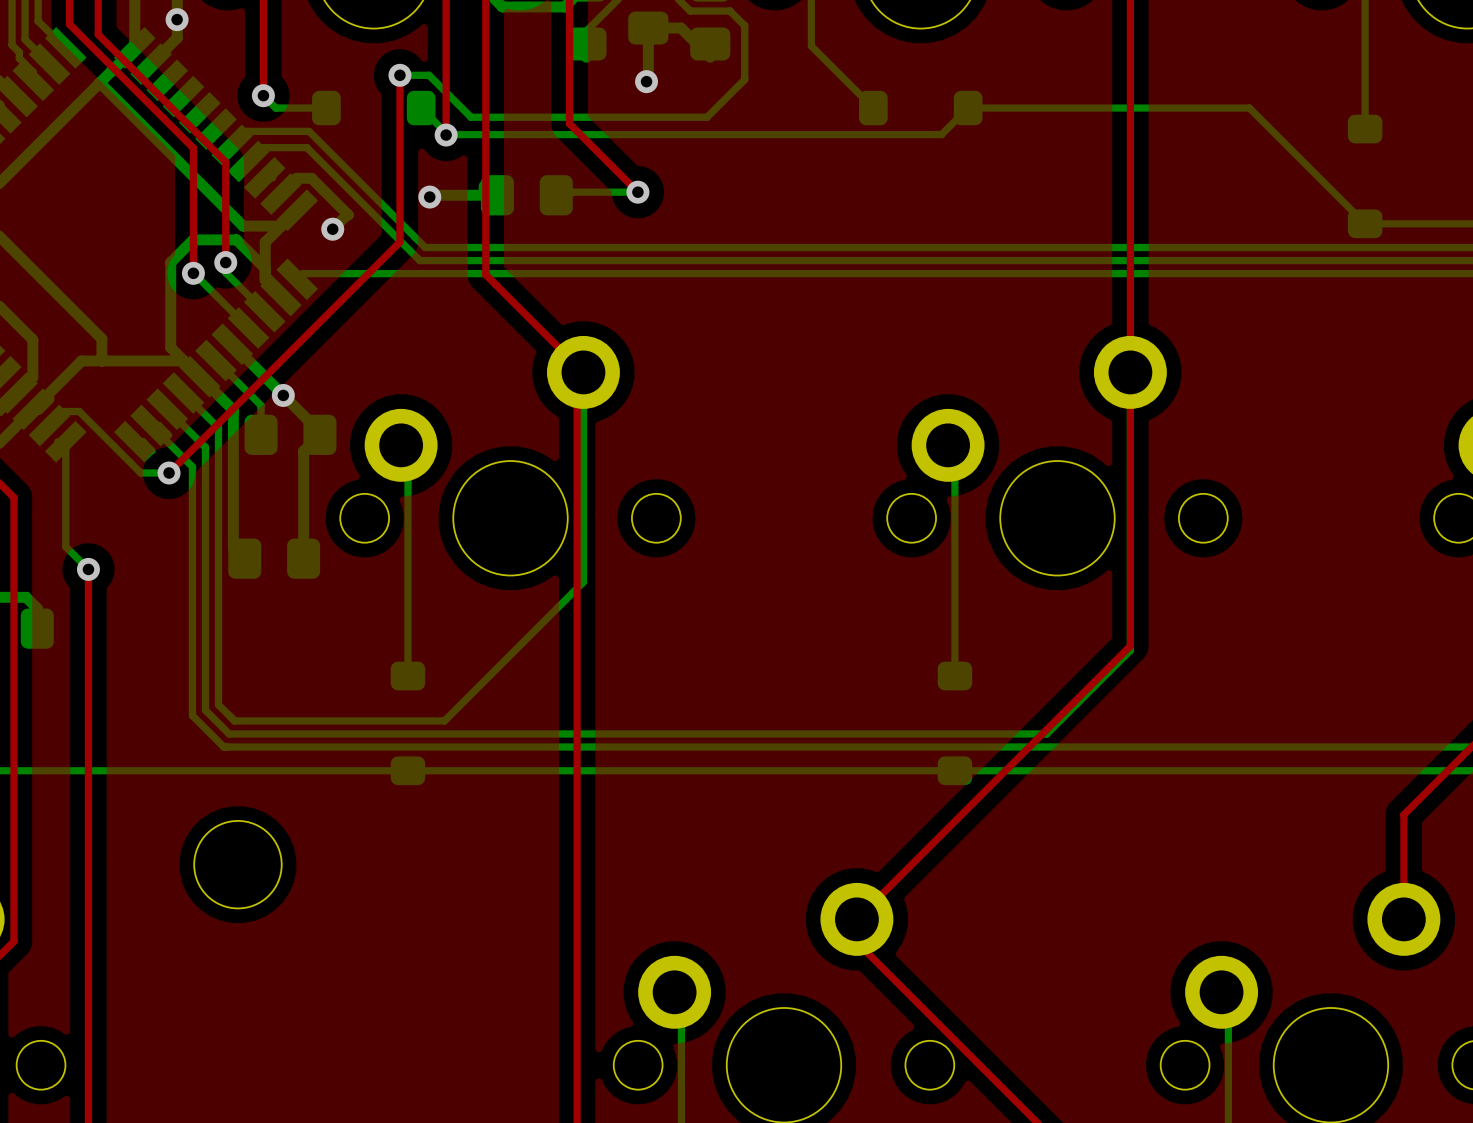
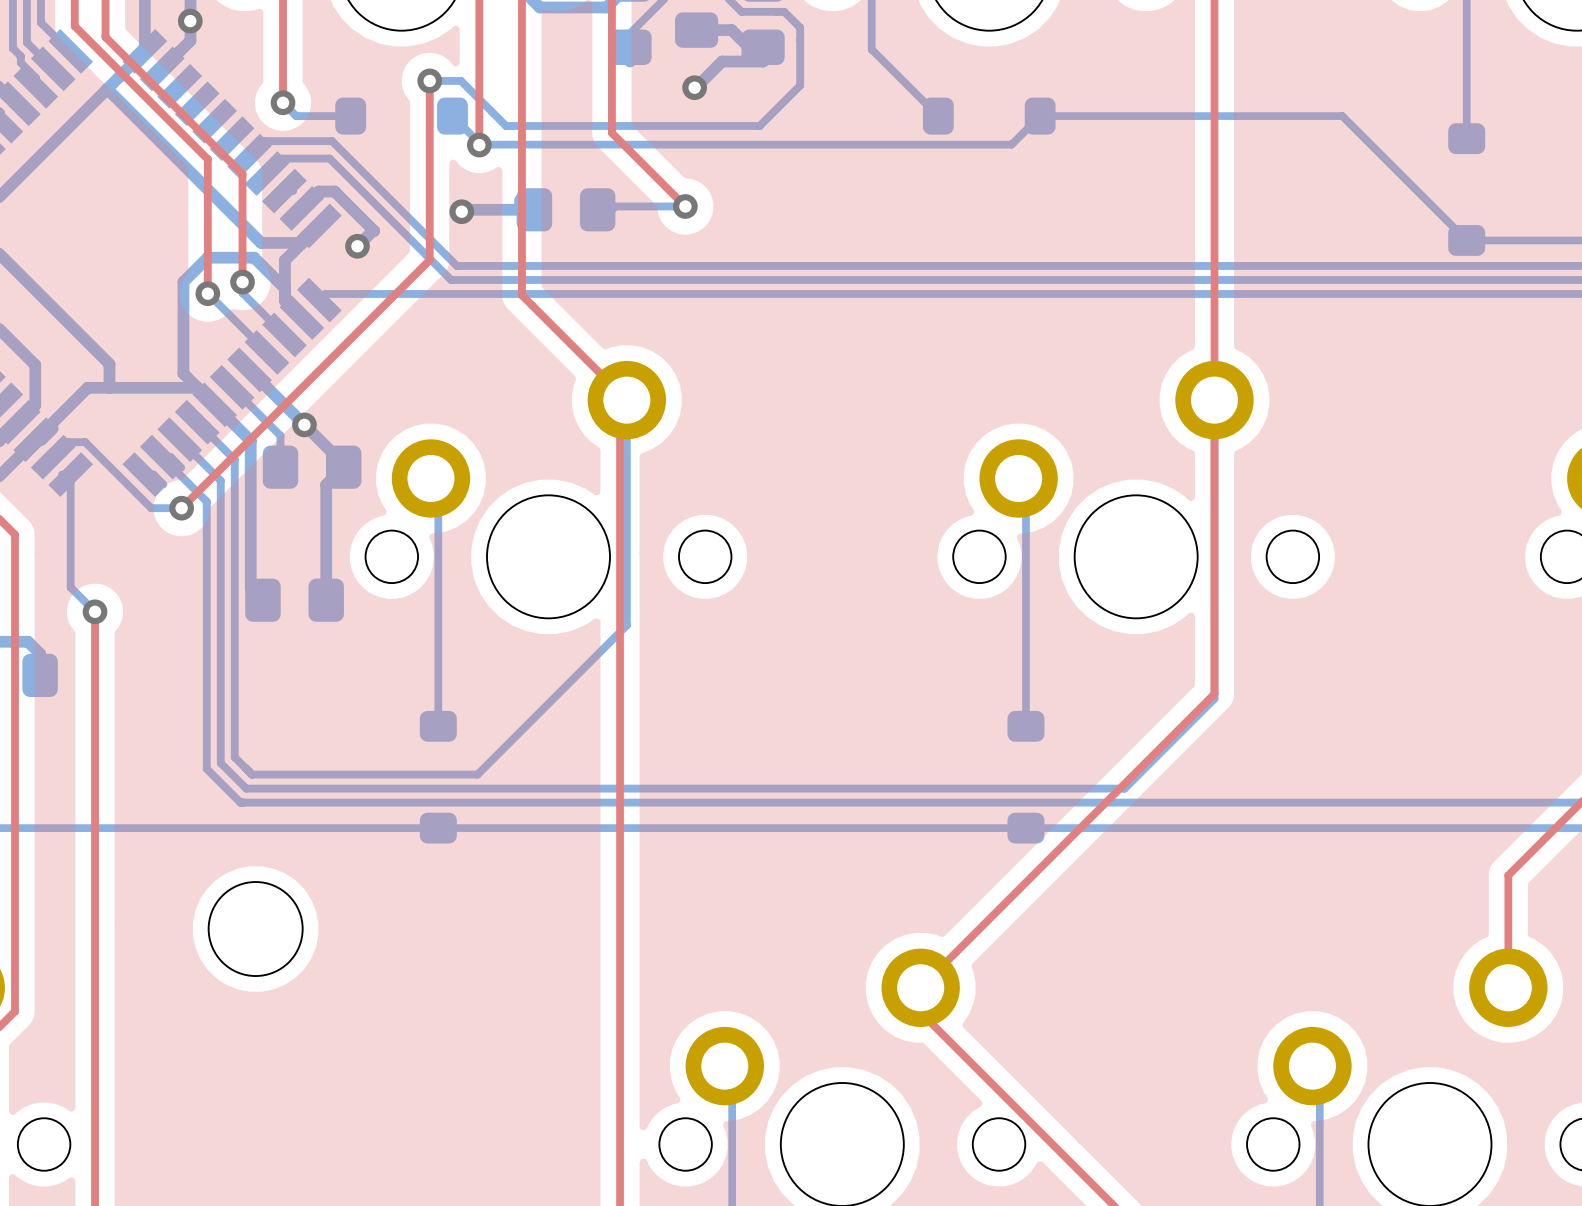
bottom track: (648, 28) (648, 79) (646, 81) -> (763, 61) (722, 61) (695, 88)

